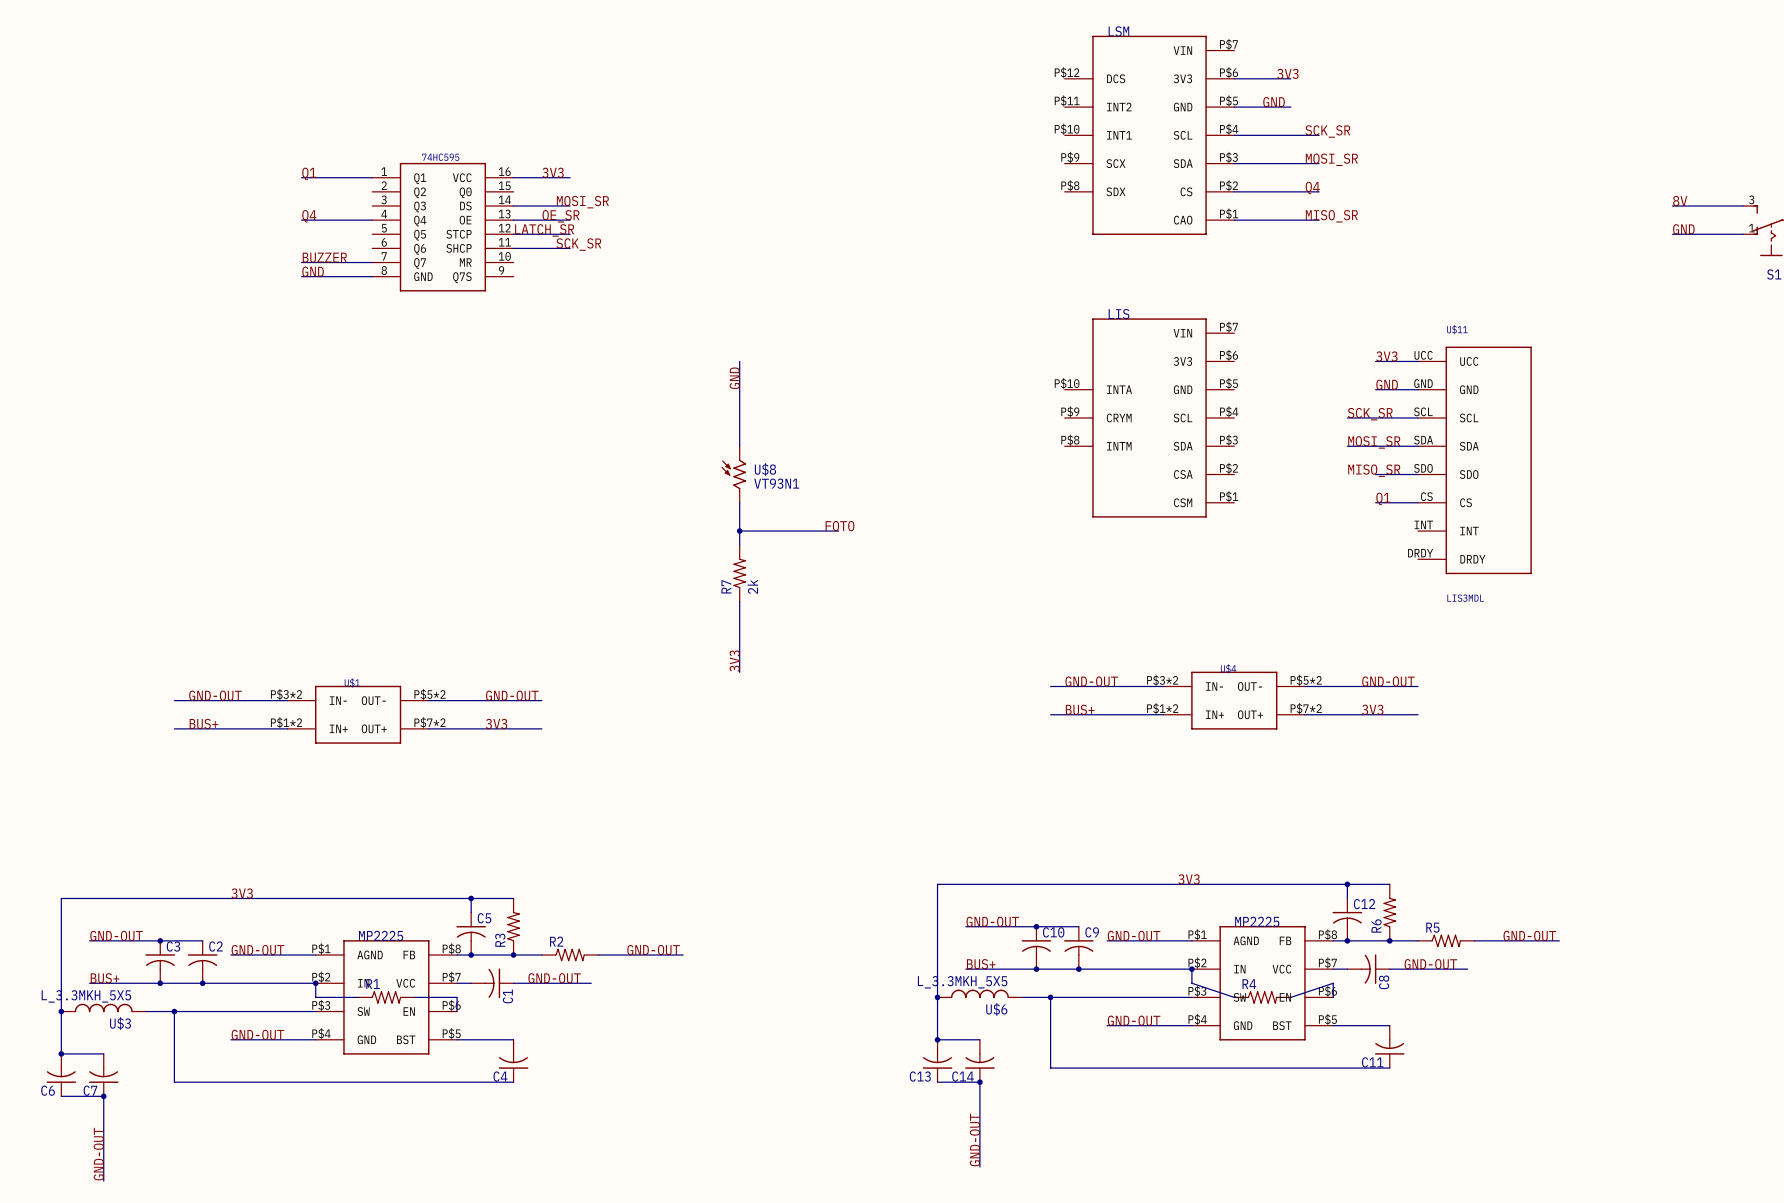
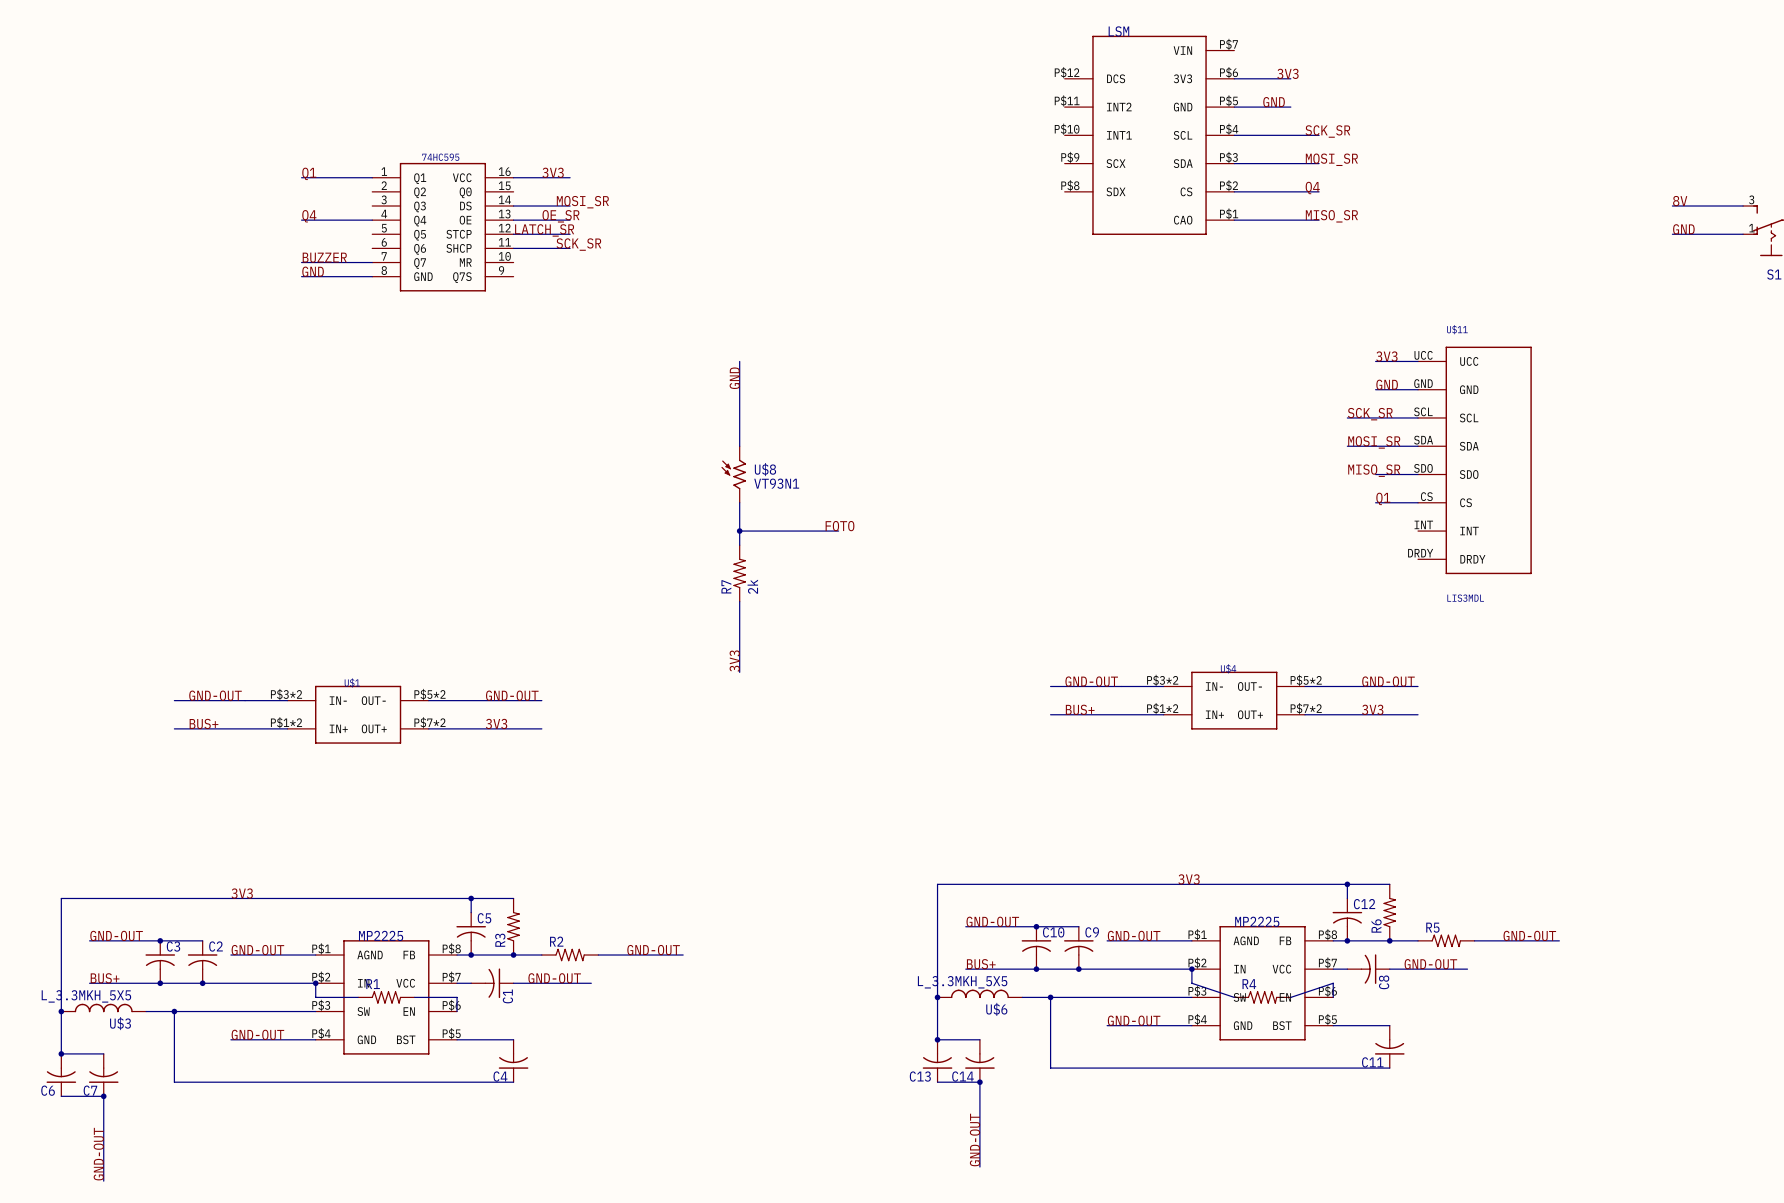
LIS: (1149, 417) -> none

